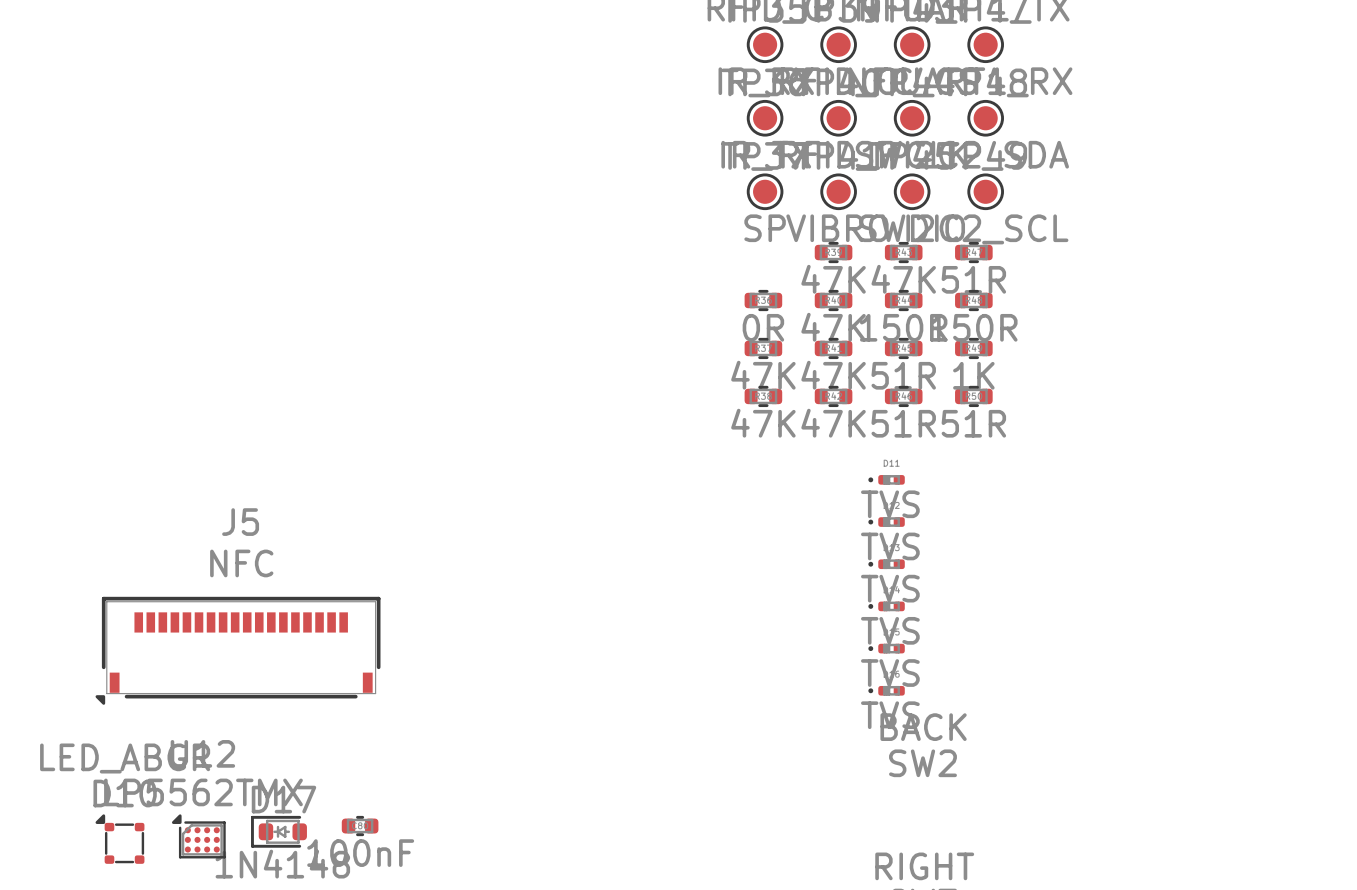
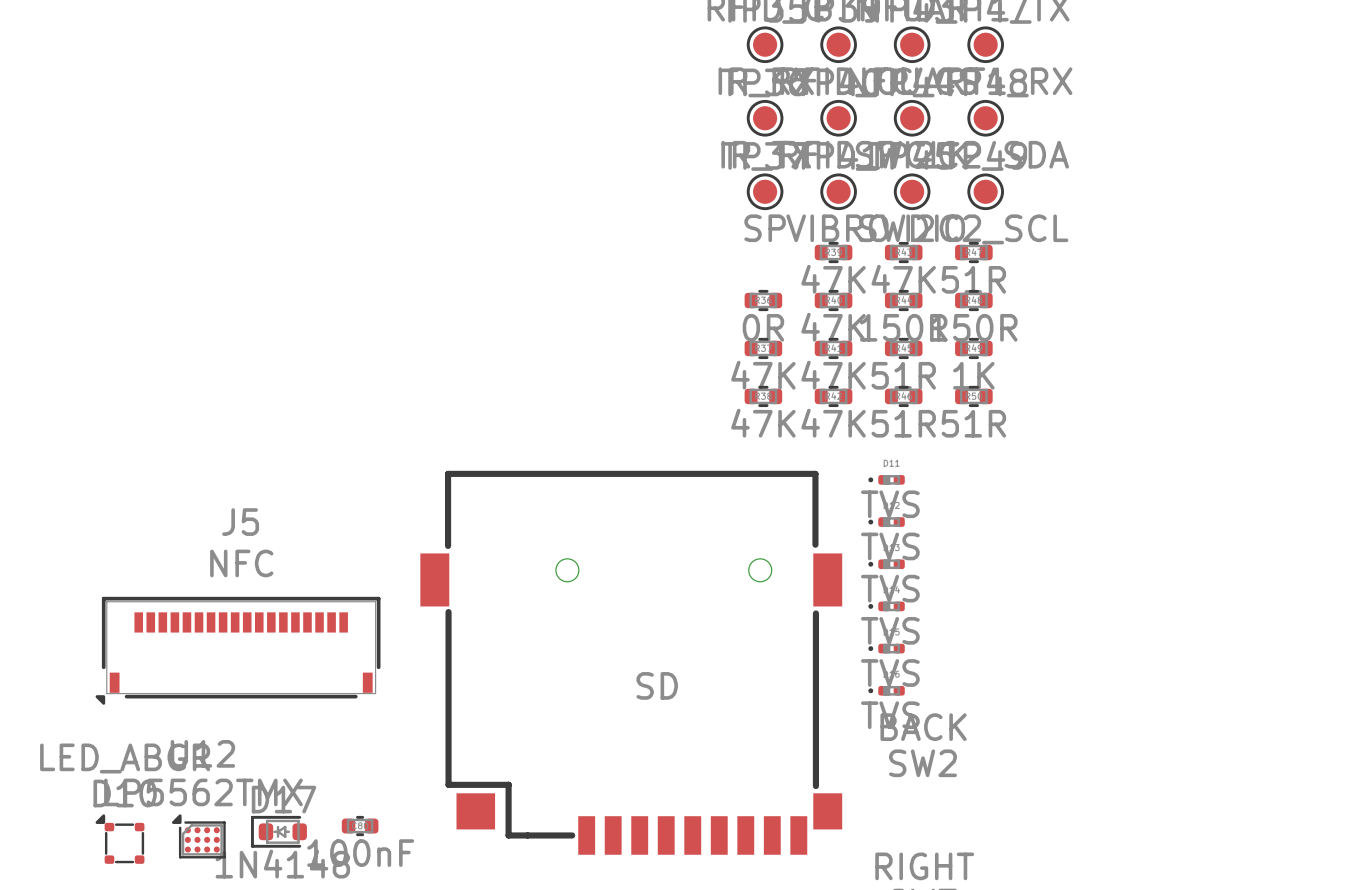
part: none -> SD (631, 662)

